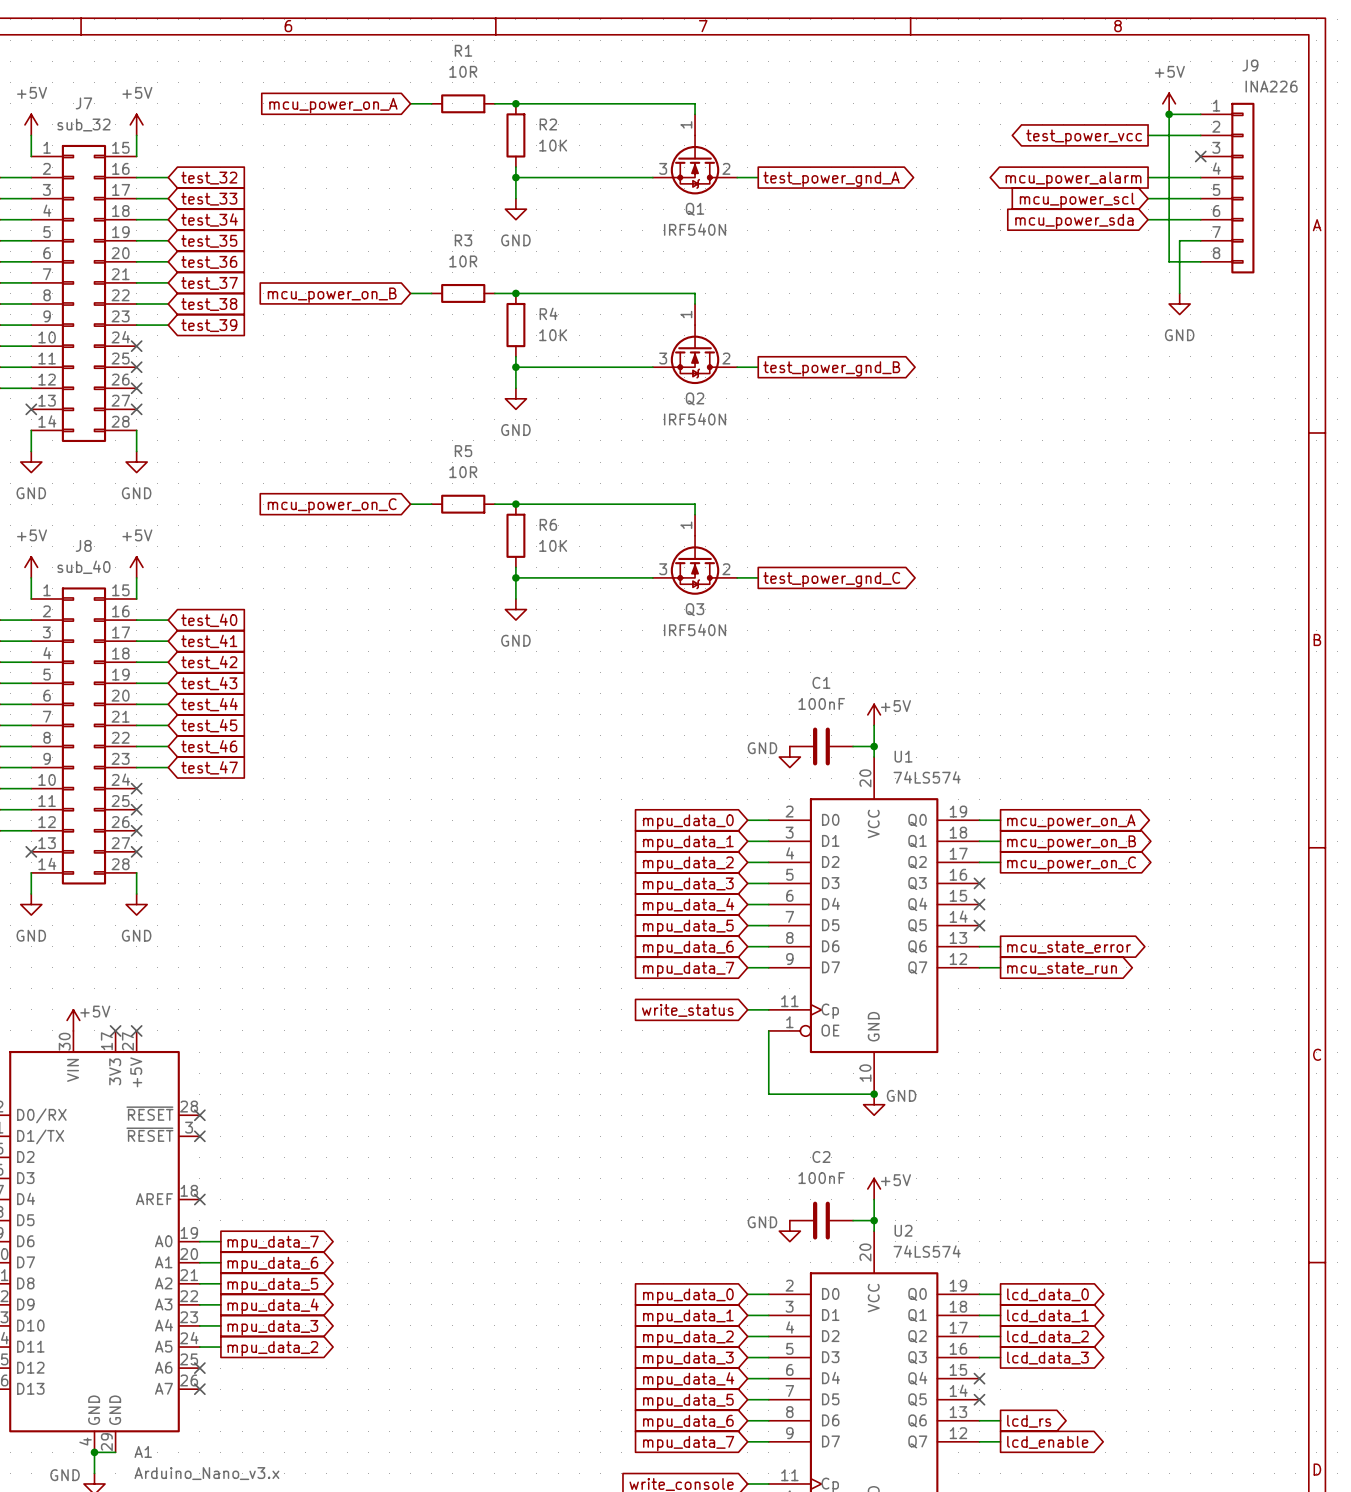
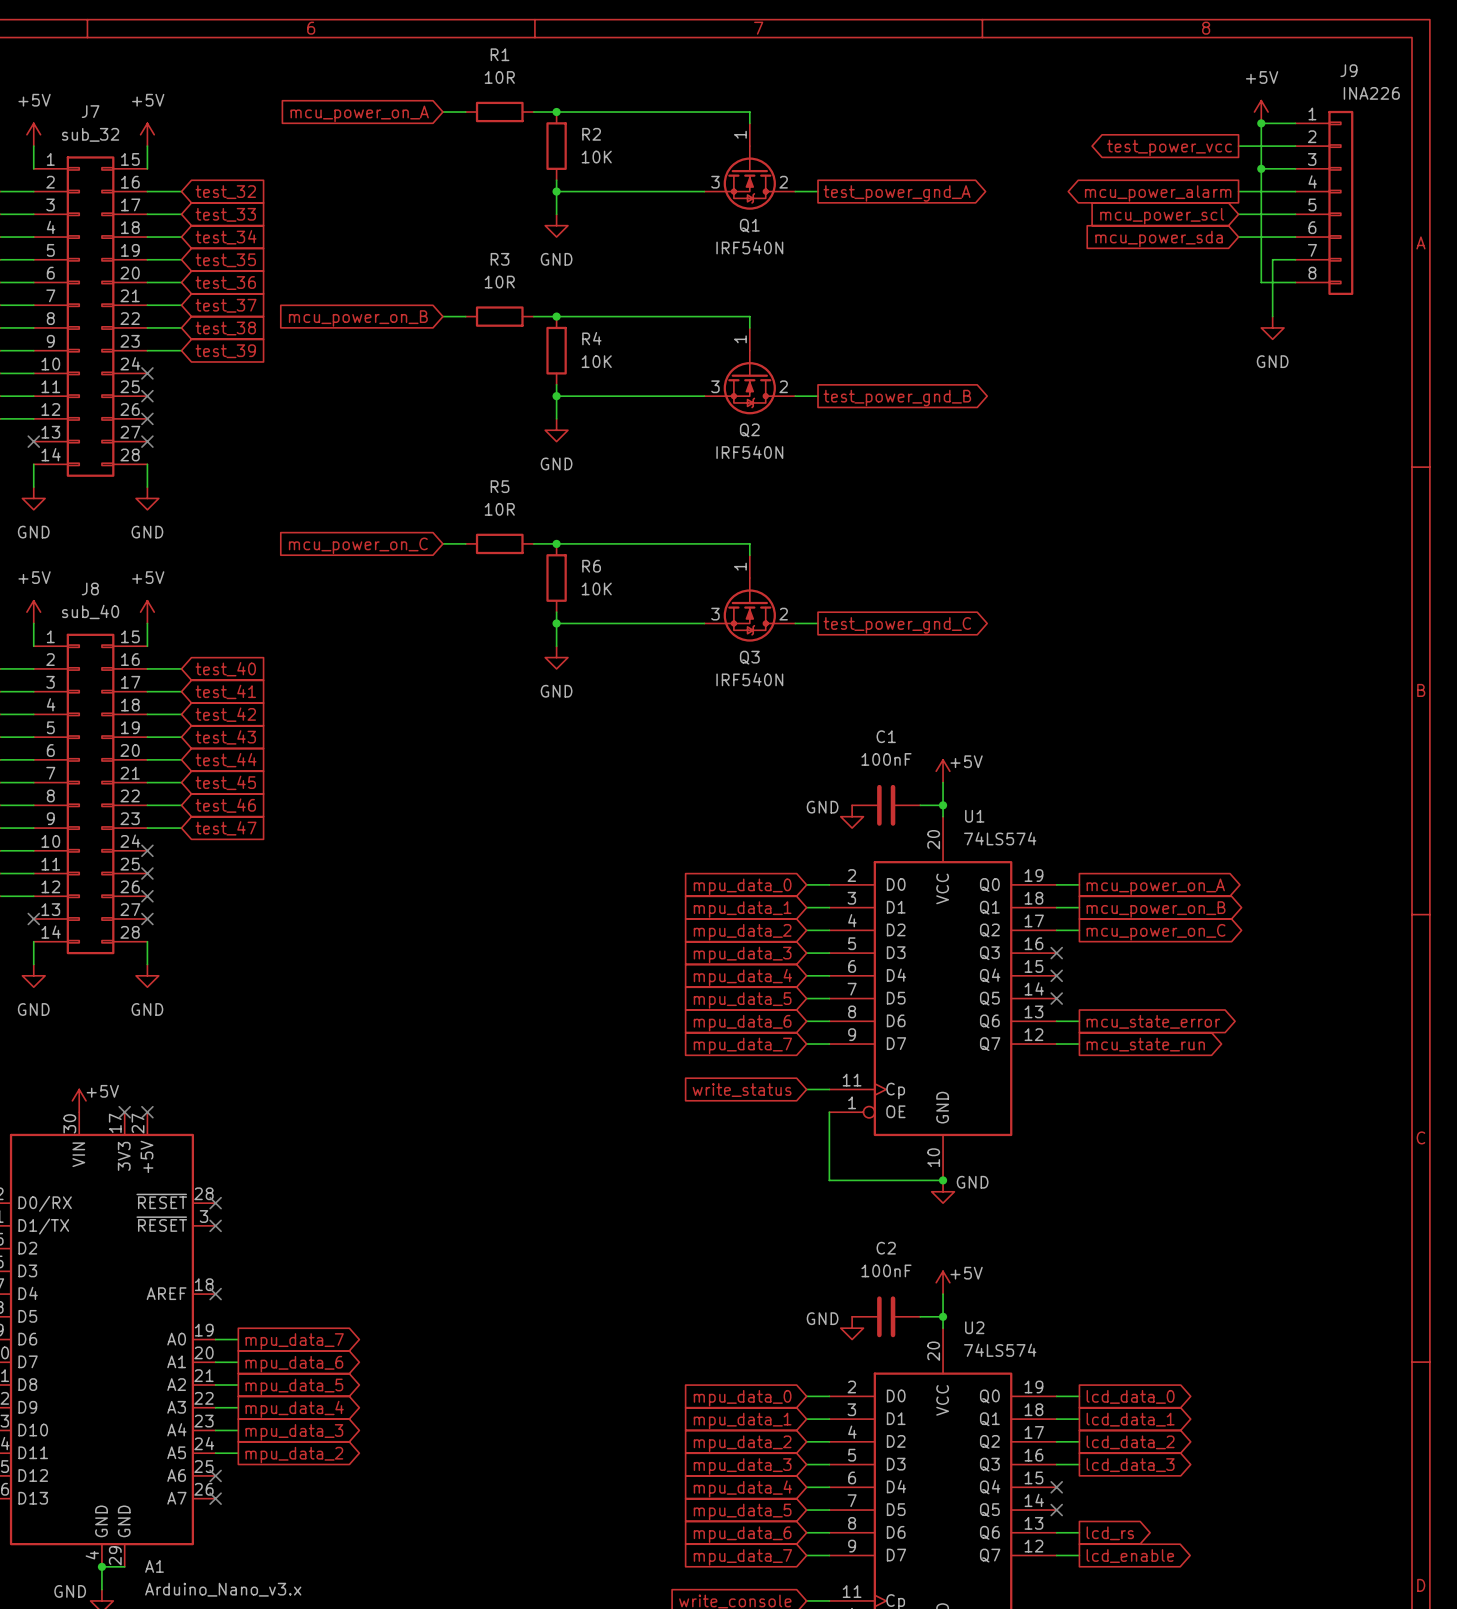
wire: none -> (1261, 168) (1295, 168)
junction: none -> (1261, 168)
no-connect mark: (1200, 156) -> none

